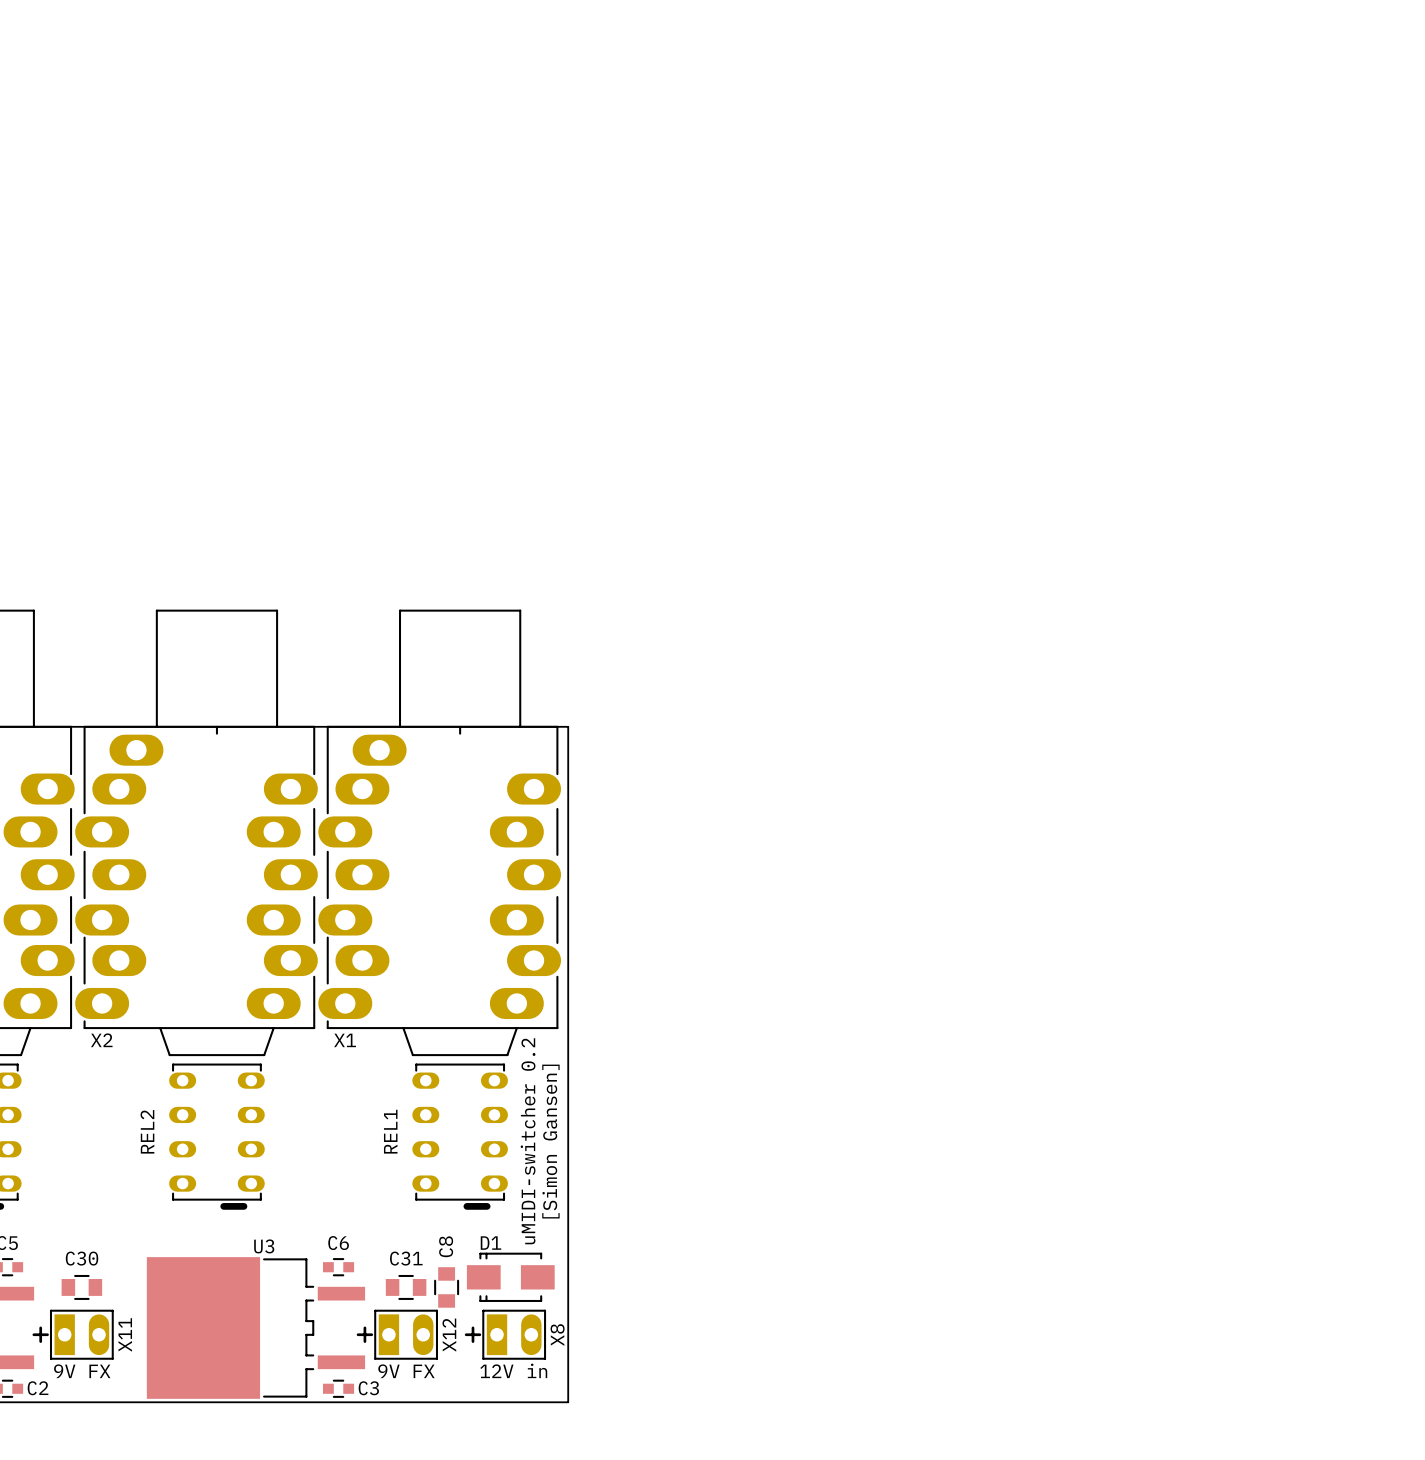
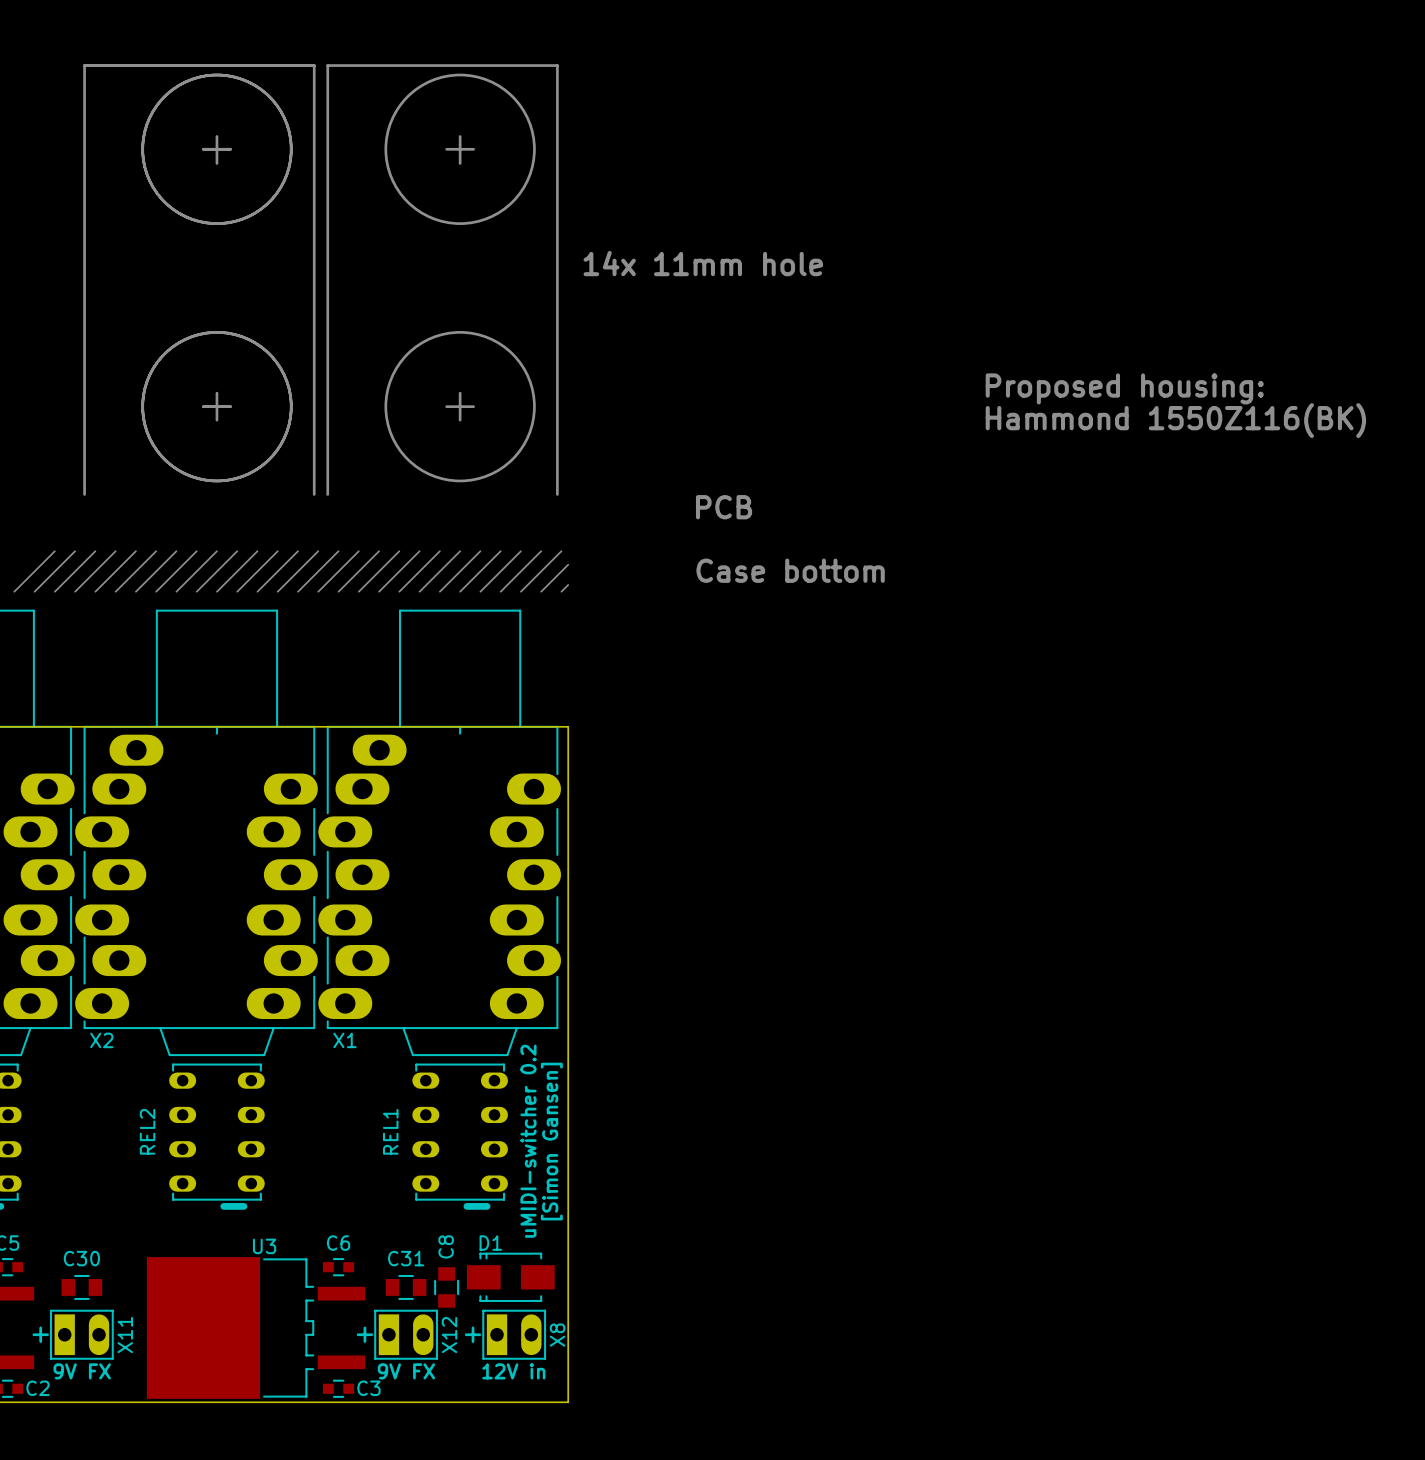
drawing: none -> [141, 73, 293, 225]
drawing: none -> [384, 73, 536, 225]
line: none -> (216, 136) (216, 163)
line: none -> (460, 136) (460, 163)
line: none -> (203, 149) (230, 149)
line: none -> (446, 149) (473, 149)
text: none -> 14x 11mm hole (703, 263)
drawing: none -> [141, 331, 293, 483]
drawing: none -> [384, 331, 536, 483]
text: none -> Proposed housing: (1124, 388)
line: none -> (216, 393) (216, 420)
line: none -> (460, 393) (460, 420)
line: none -> (203, 406) (230, 406)
line: none -> (446, 406) (473, 406)
text: none -> Hammond 1550Z116(BK) (1175, 420)
line: none -> (84, 494) (84, 65) (314, 65) (314, 494)
line: none -> (327, 494) (327, 65) (557, 65) (557, 494)
text: none -> PCB (724, 507)
line: none -> (54, 551) (14, 591)
line: none -> (75, 551) (34, 591)
line: none -> (95, 551) (54, 591)
line: none -> (115, 551) (75, 591)
line: none -> (135, 551) (95, 591)
line: none -> (156, 551) (115, 591)
line: none -> (176, 551) (135, 591)
line: none -> (196, 551) (156, 591)
line: none -> (216, 551) (176, 591)
line: none -> (237, 551) (196, 591)
line: none -> (257, 551) (216, 591)
line: none -> (277, 551) (237, 591)
line: none -> (298, 551) (257, 591)
line: none -> (318, 551) (277, 591)
line: none -> (338, 551) (298, 591)
line: none -> (358, 551) (318, 591)
line: none -> (379, 551) (338, 591)
line: none -> (399, 551) (358, 591)
line: none -> (419, 551) (379, 591)
line: none -> (439, 551) (399, 591)
line: none -> (460, 551) (419, 591)
line: none -> (480, 551) (439, 591)
line: none -> (500, 551) (460, 591)
line: none -> (520, 551) (480, 591)
line: none -> (541, 551) (500, 591)
line: none -> (561, 551) (520, 591)
line: none -> (568, 564) (541, 591)
text: none -> Case bottom (790, 570)
line: none -> (568, 584) (561, 591)

